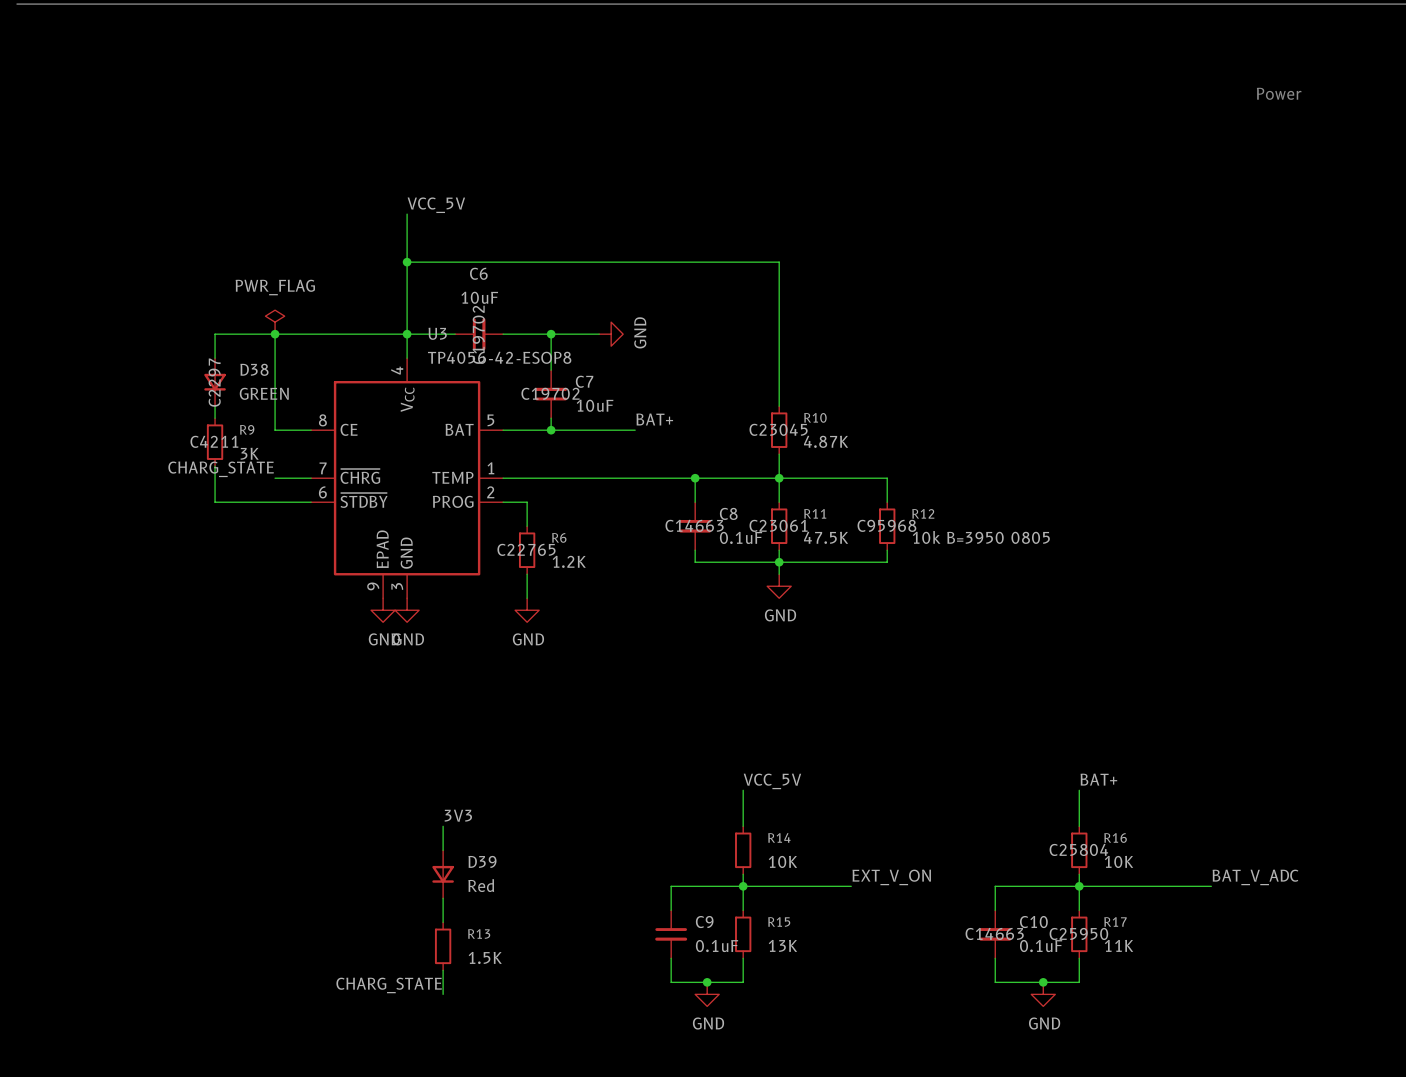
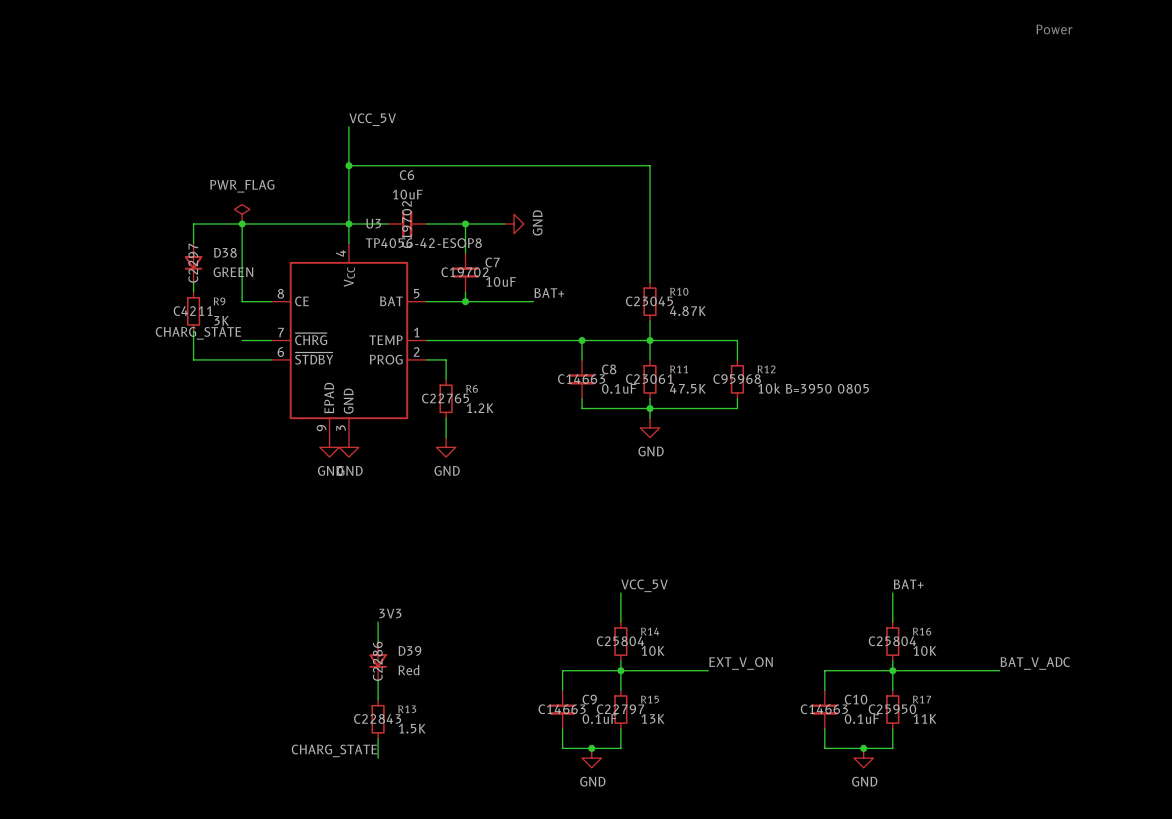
R14 text: none -> C25804 (620, 641)
D39 text: none -> C2286 (377, 661)
C9 text: none -> C14663 (562, 709)
R15 text: none -> C22797 (620, 709)
R13 text: none -> C22843 (377, 718)

